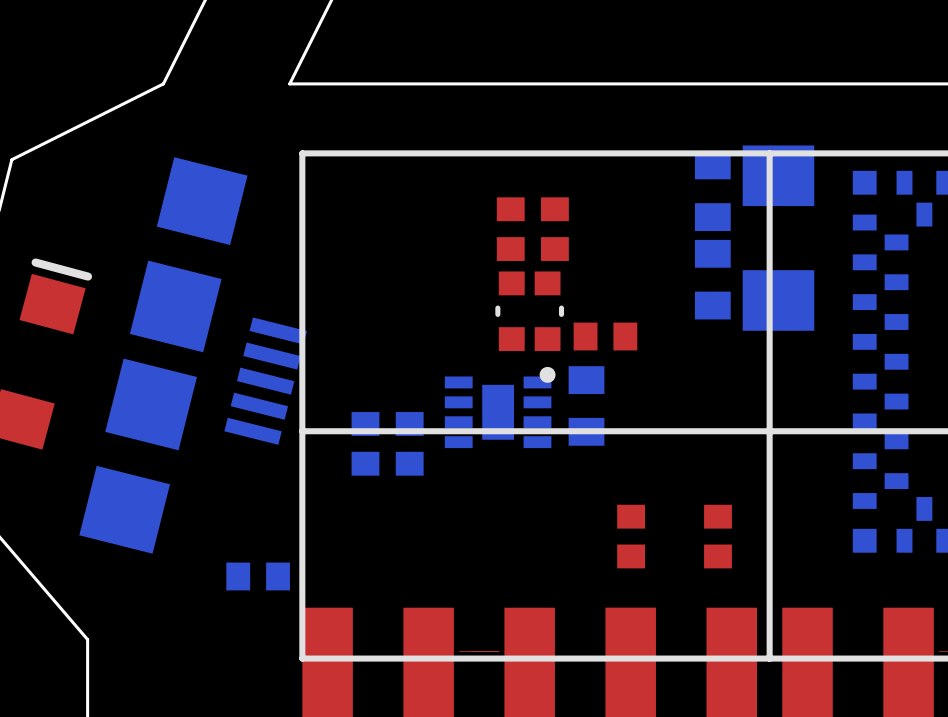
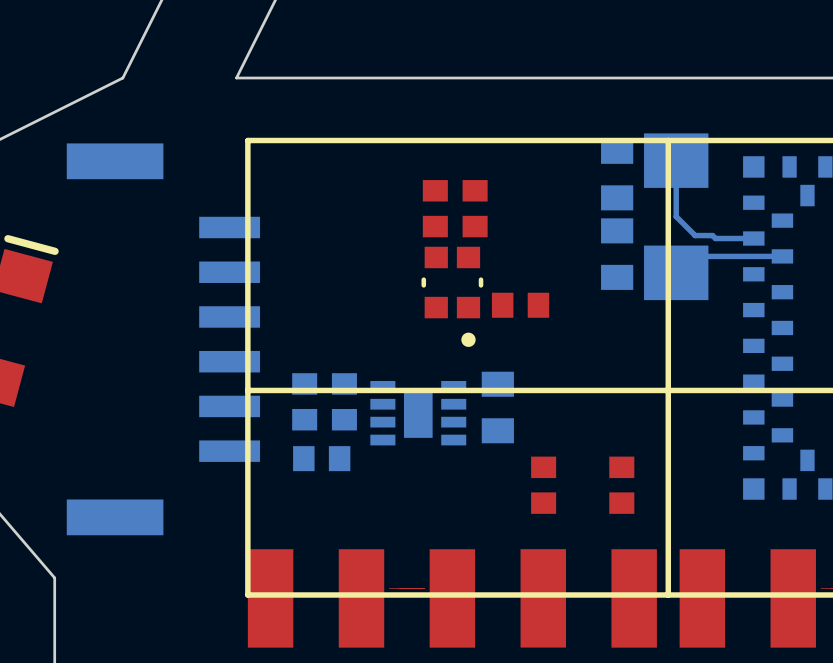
part footprint: [79, 157, 307, 554] -> [66, 143, 261, 536]
bottom track: none -> (676, 160) (676, 216) (695, 235) (712, 235) (715, 238) (753, 238)
bottom track: none -> (782, 256) (692, 256) (676, 272)
part position: (586, 405) -> (497, 407)
part position: (498, 412) -> (418, 413)
part position: (258, 576) -> (321, 458)

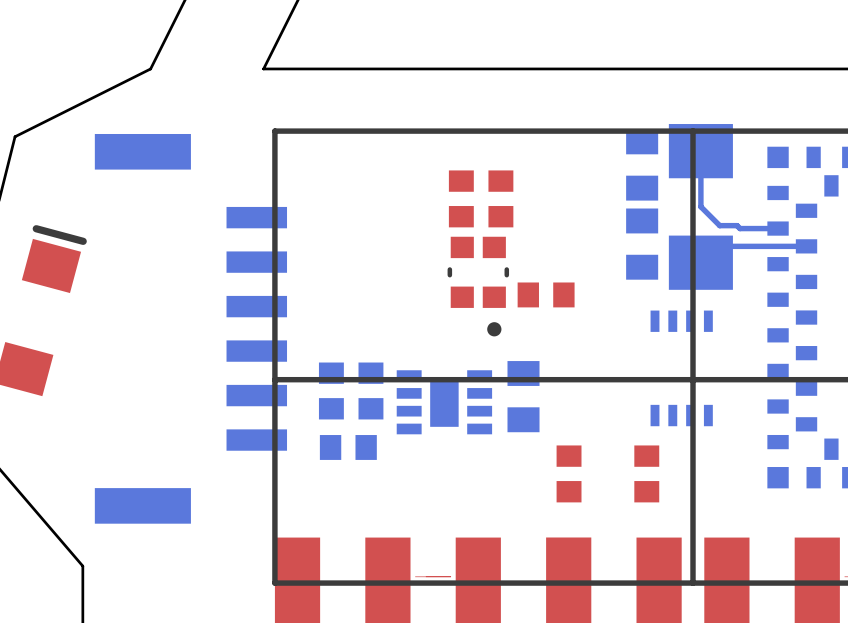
part: none -> (681, 368)

